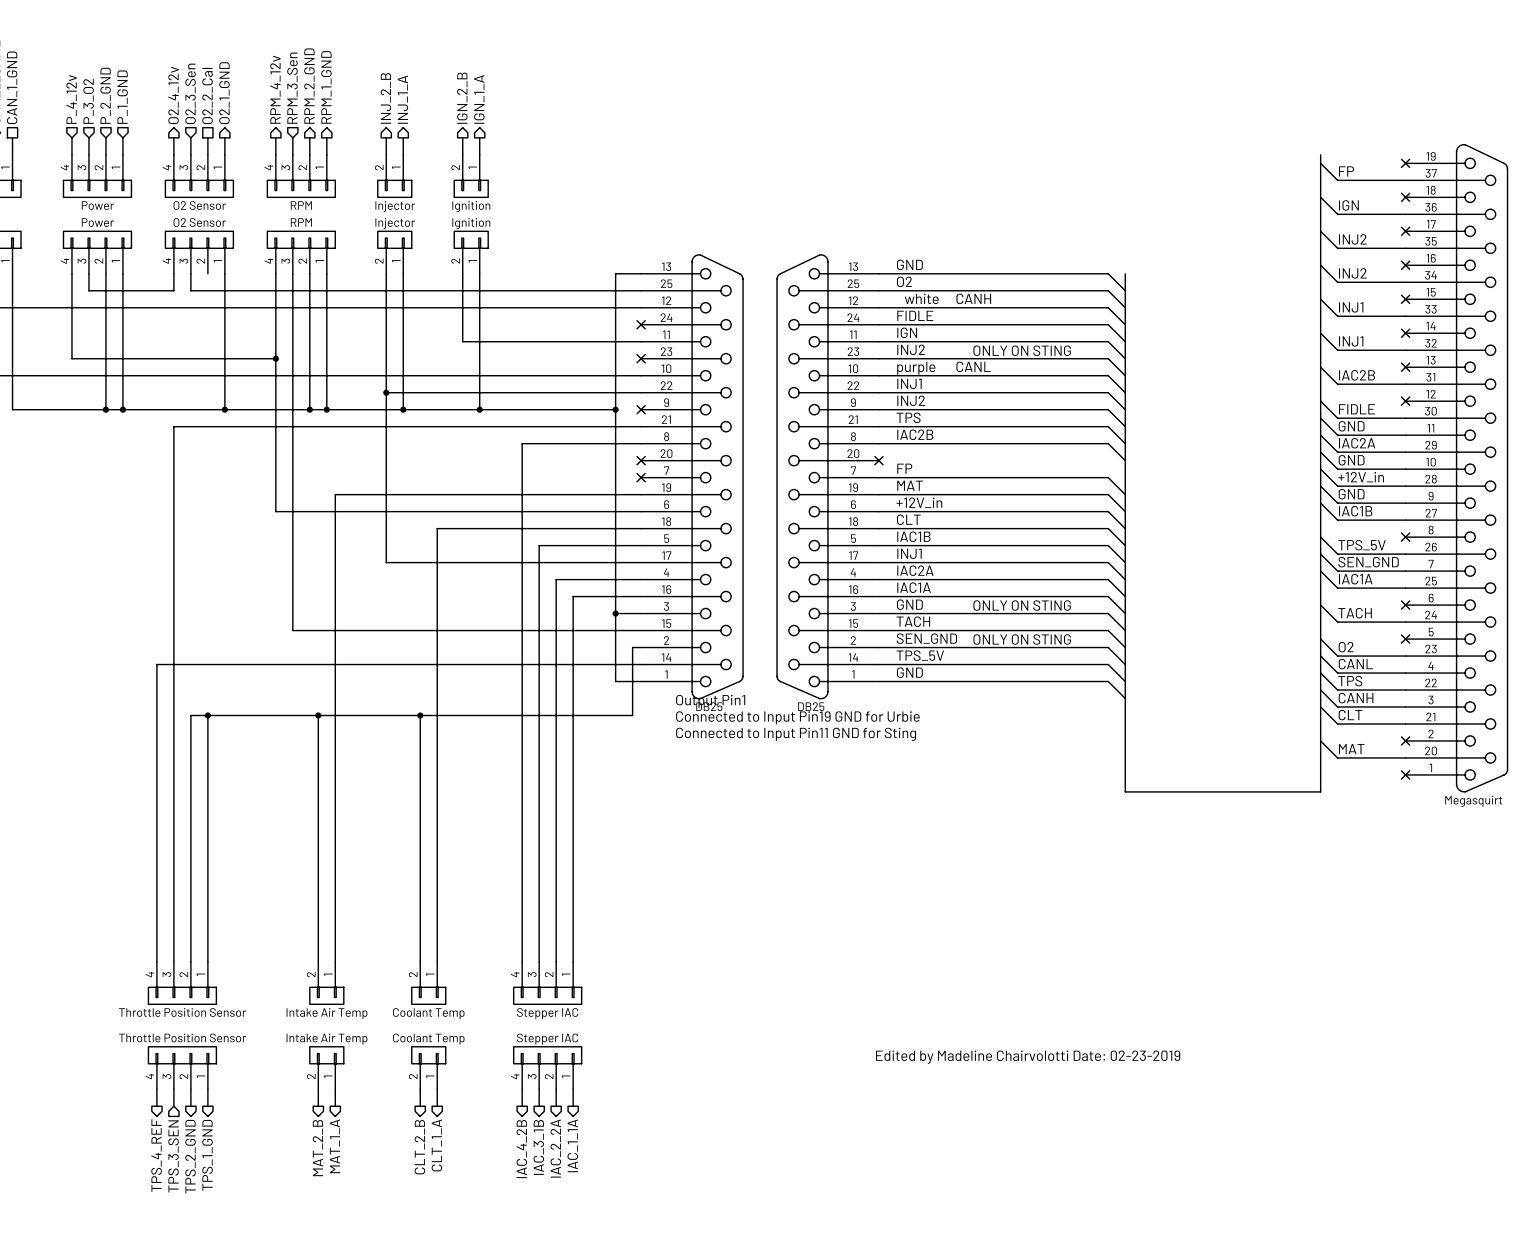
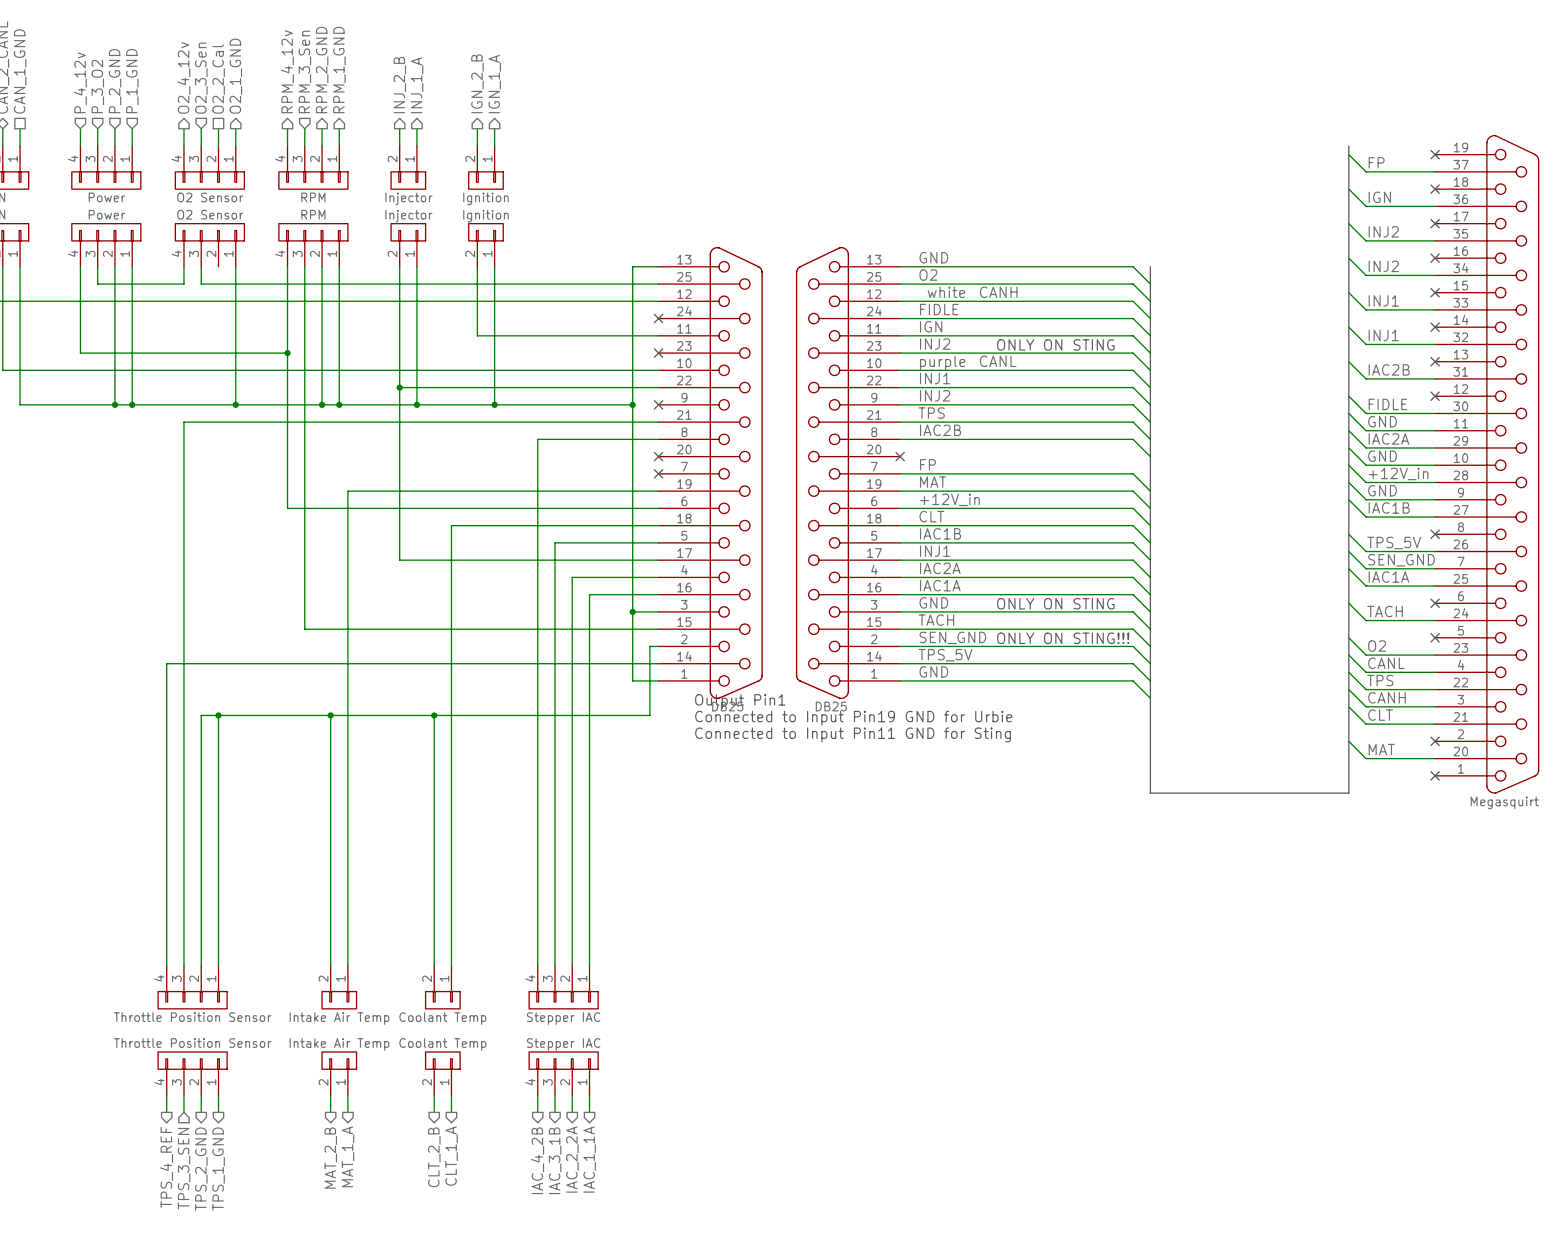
text: ONLY ON STING (1022, 639) -> ONLY ON STING!!! (1063, 638)
text: Edited by Madeline Chairvolotti Date: 02-23-2019 (1028, 1057) -> none

